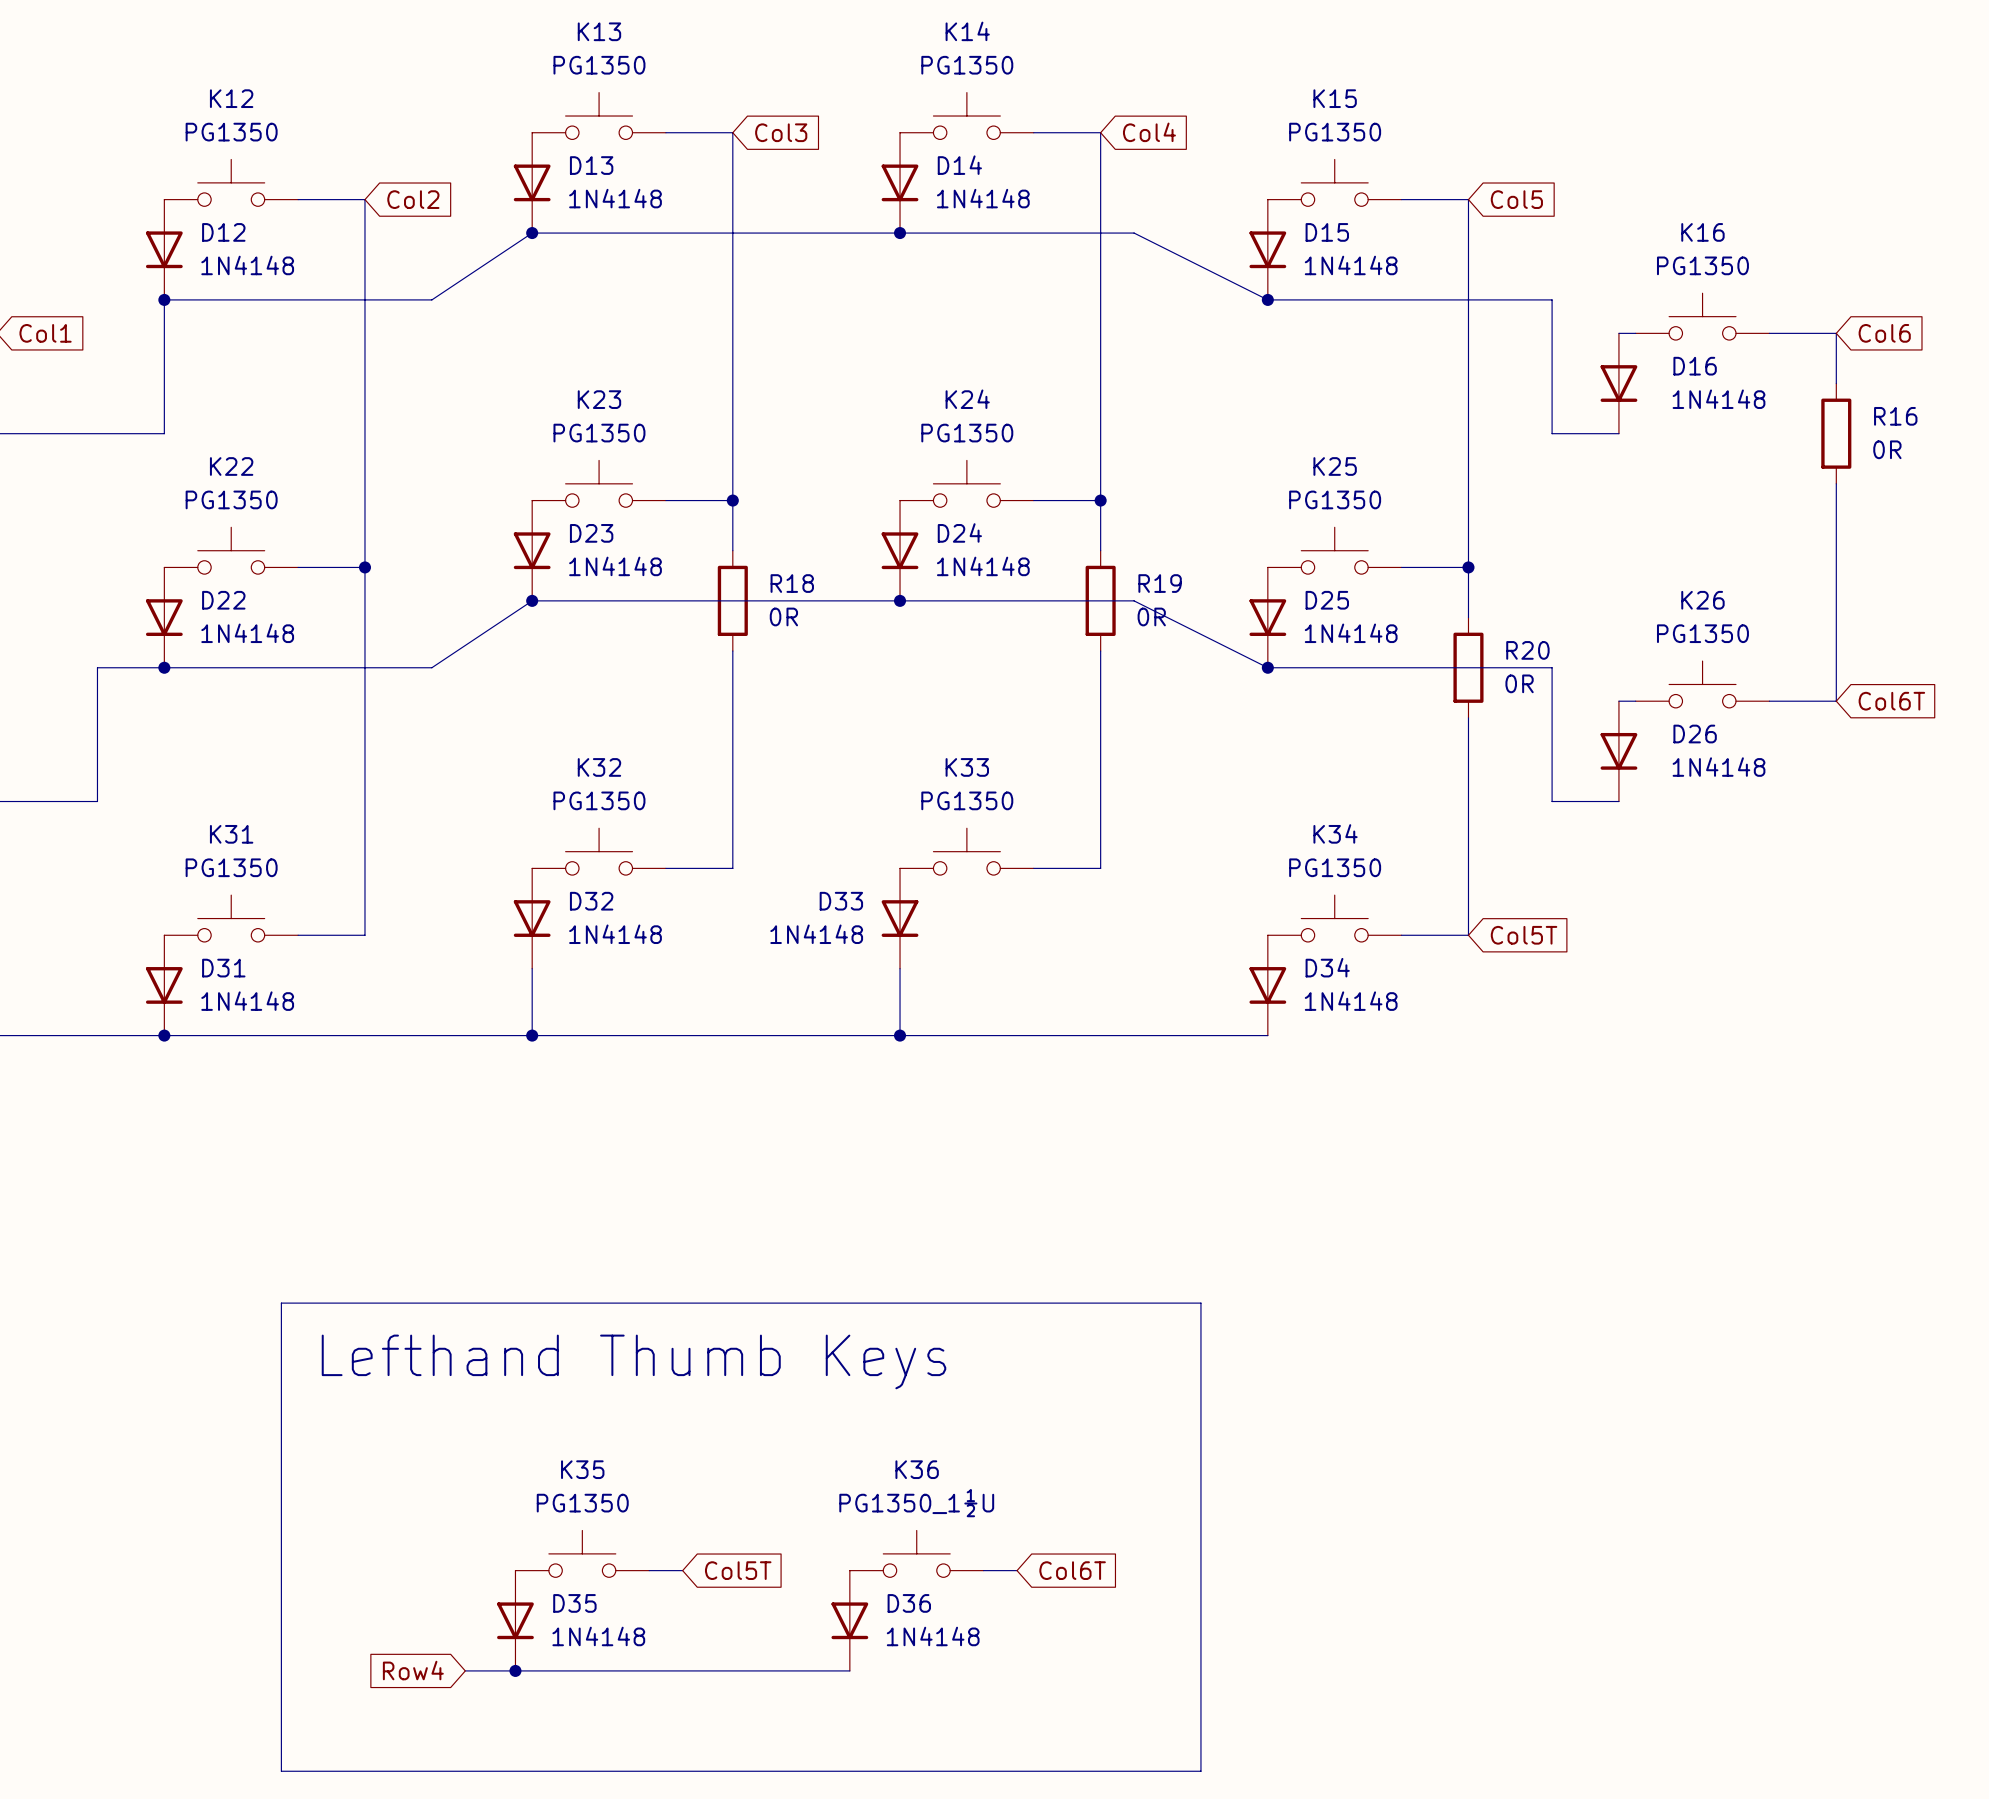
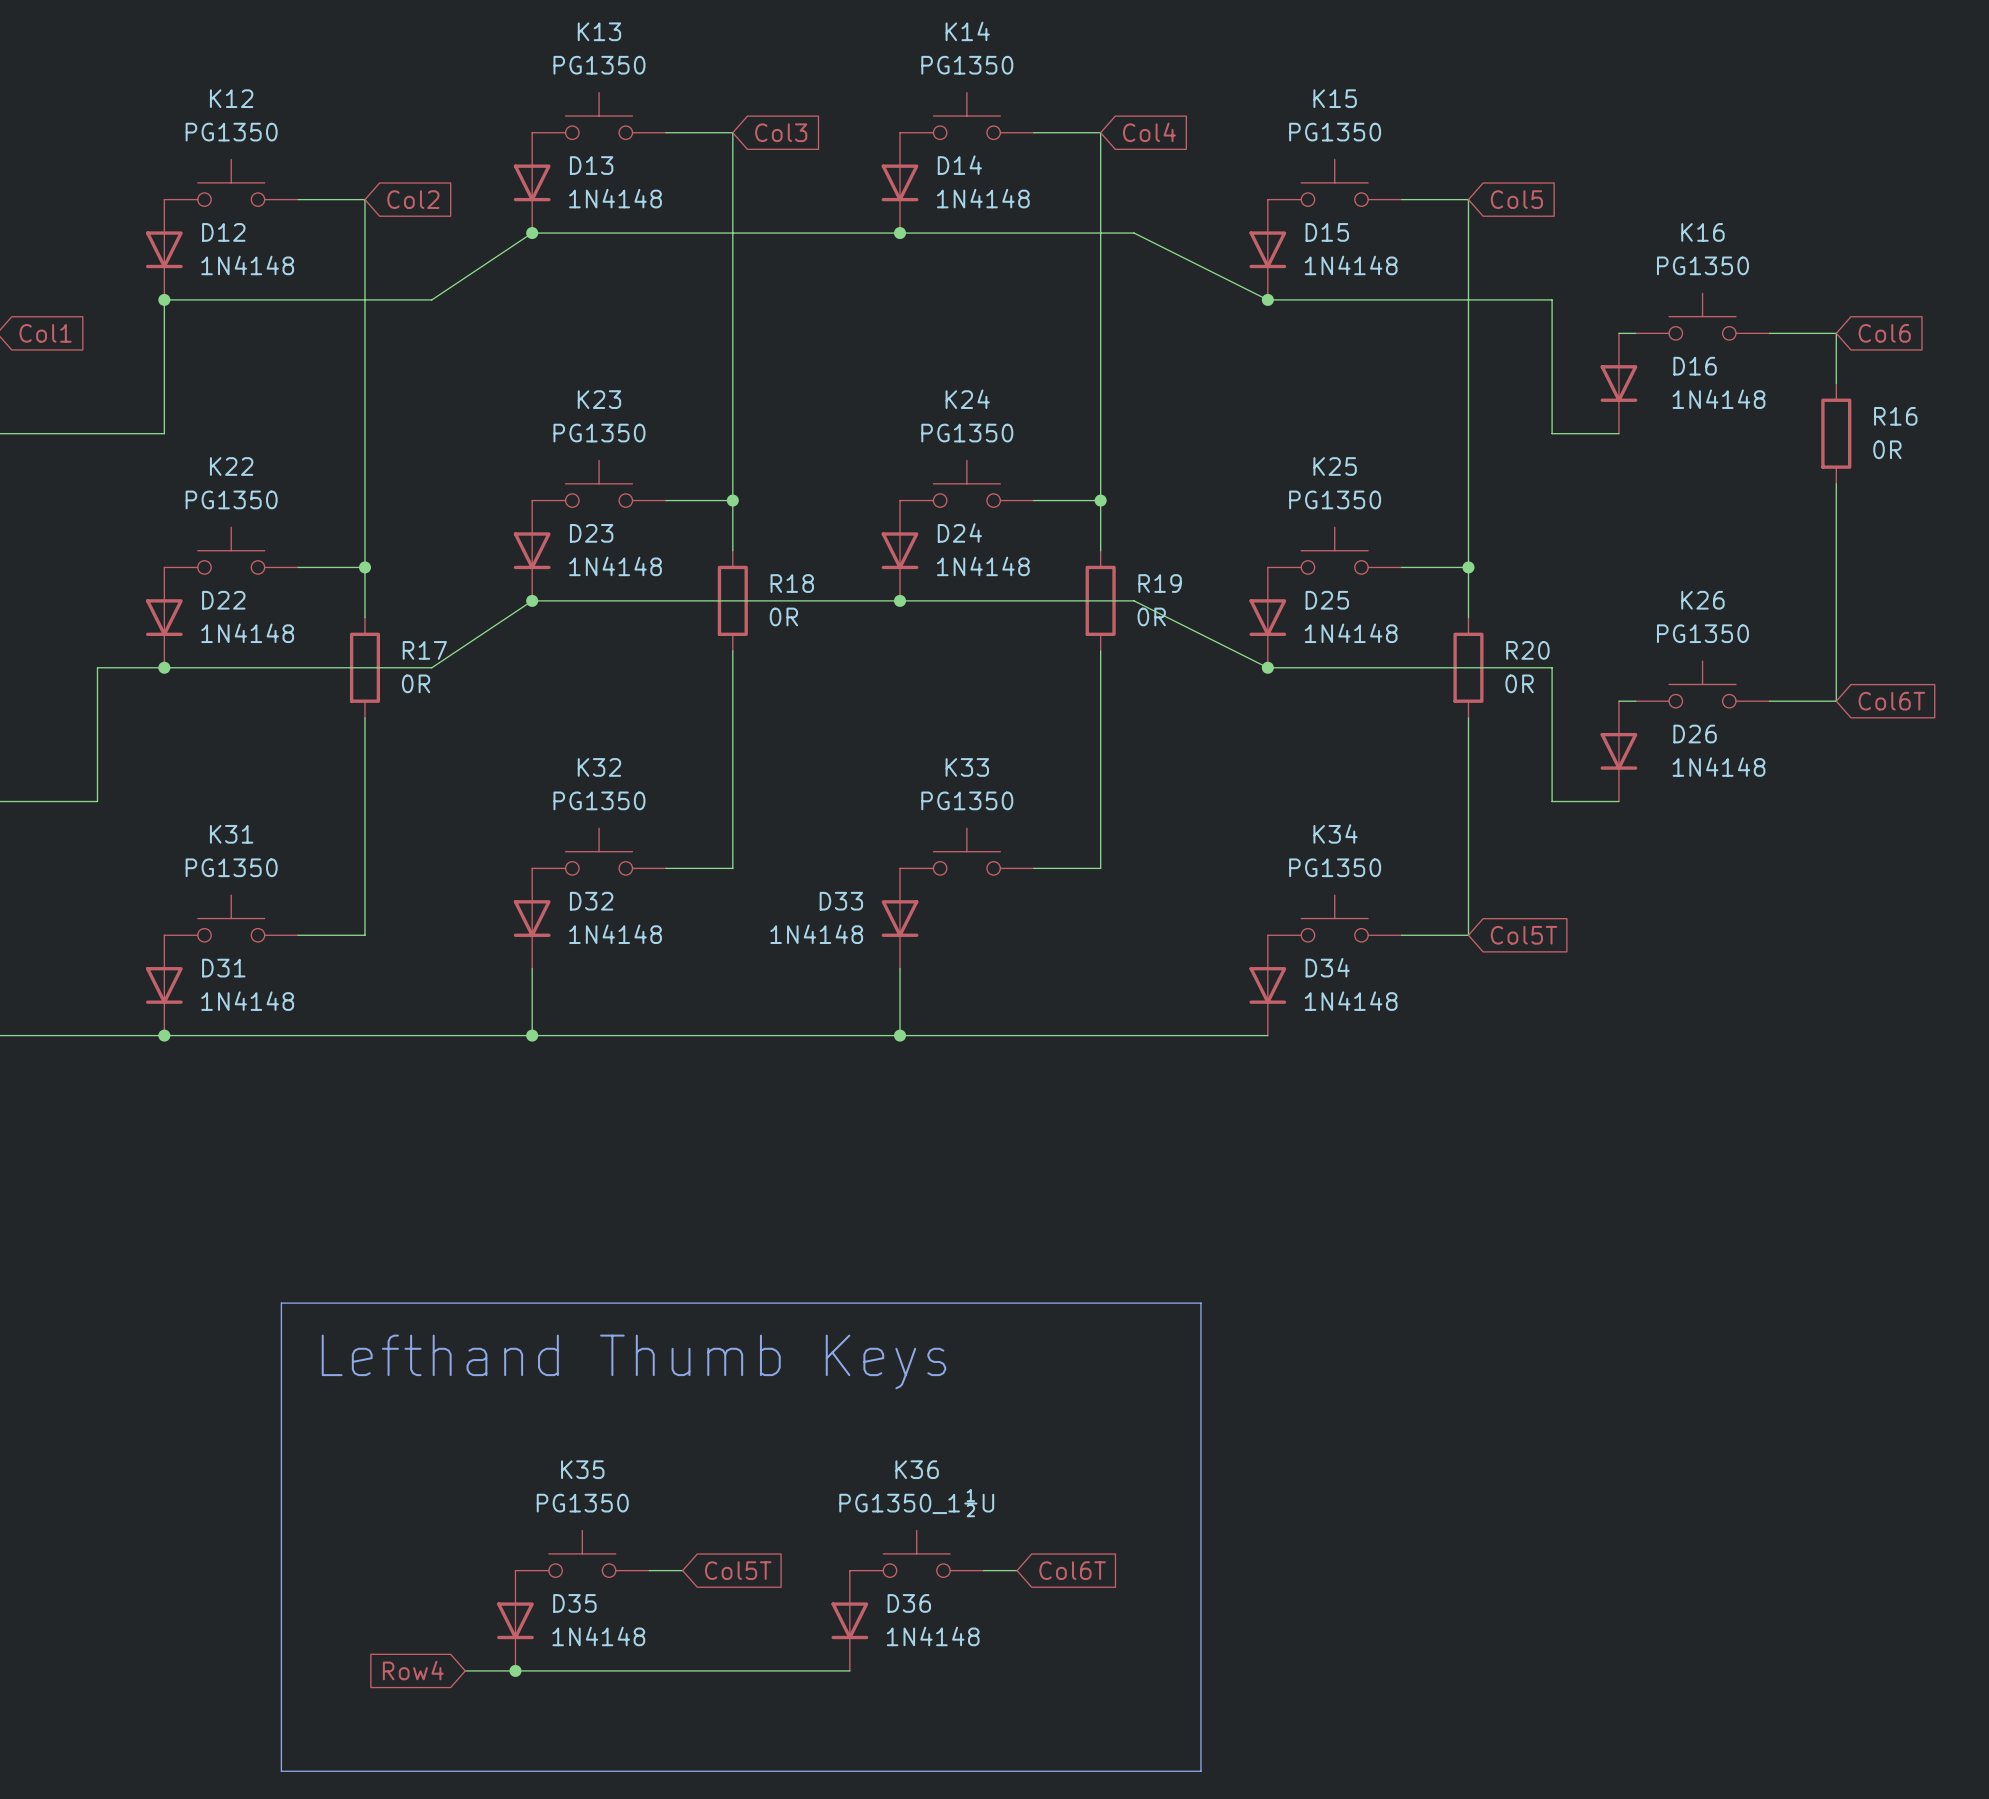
wire: (364, 617) (364, 717) -> none
R17: none -> 0R (364, 667)

